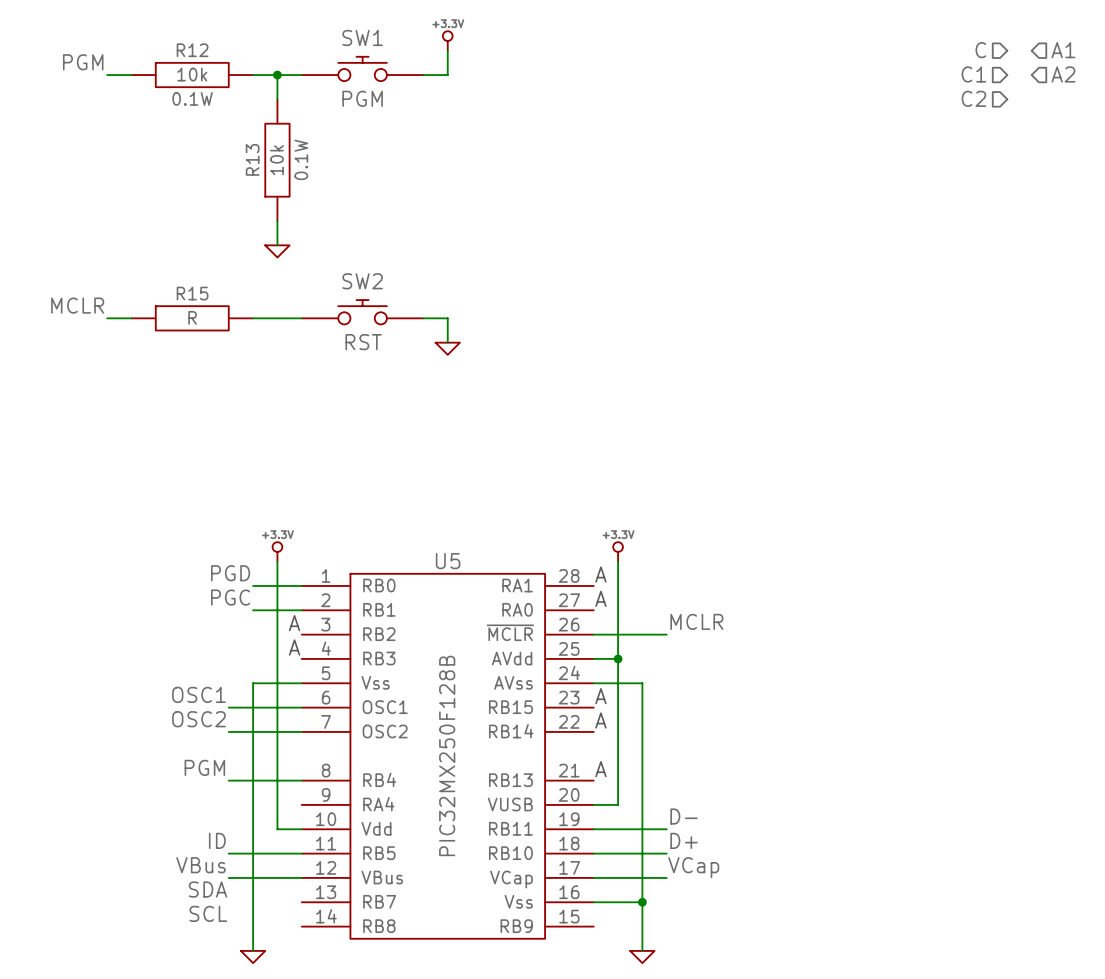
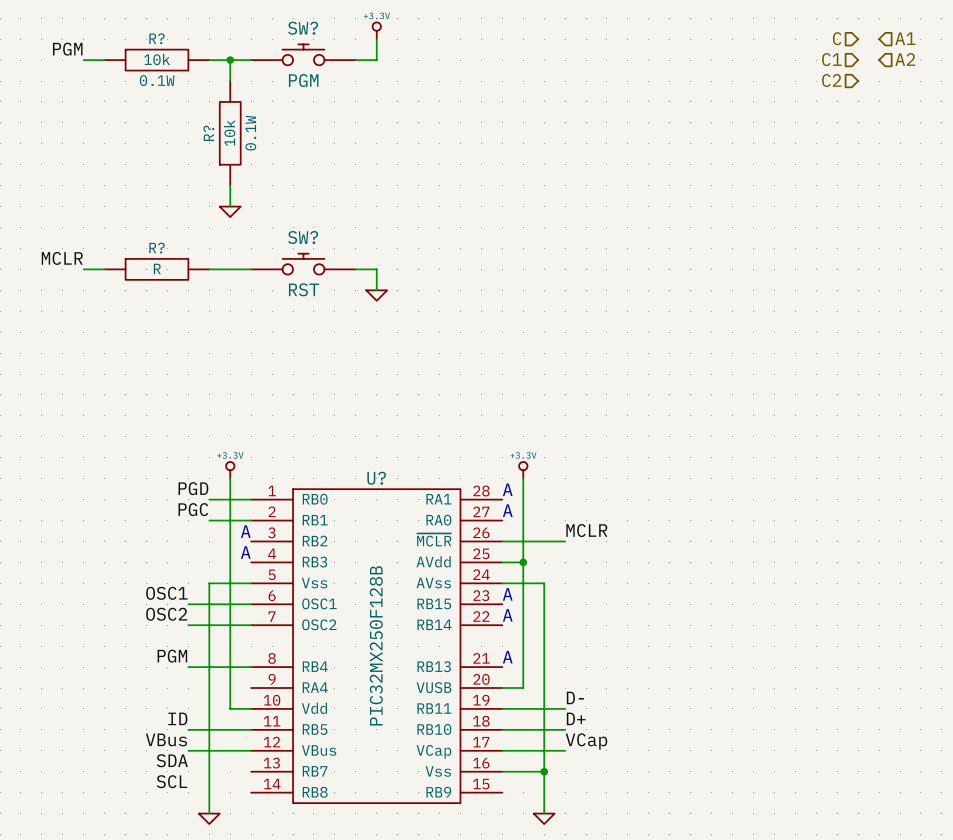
SW1 name: SW1 (362, 37) -> SW? (303, 28)
R12 name: R12 (192, 50) -> R? (156, 38)
R13 name: R13 (252, 159) -> R? (208, 133)
SW2 name: SW2 (362, 281) -> SW? (303, 237)
R15 name: R15 (192, 293) -> R? (156, 248)
U5 name: U5 (448, 561) -> U? (376, 478)

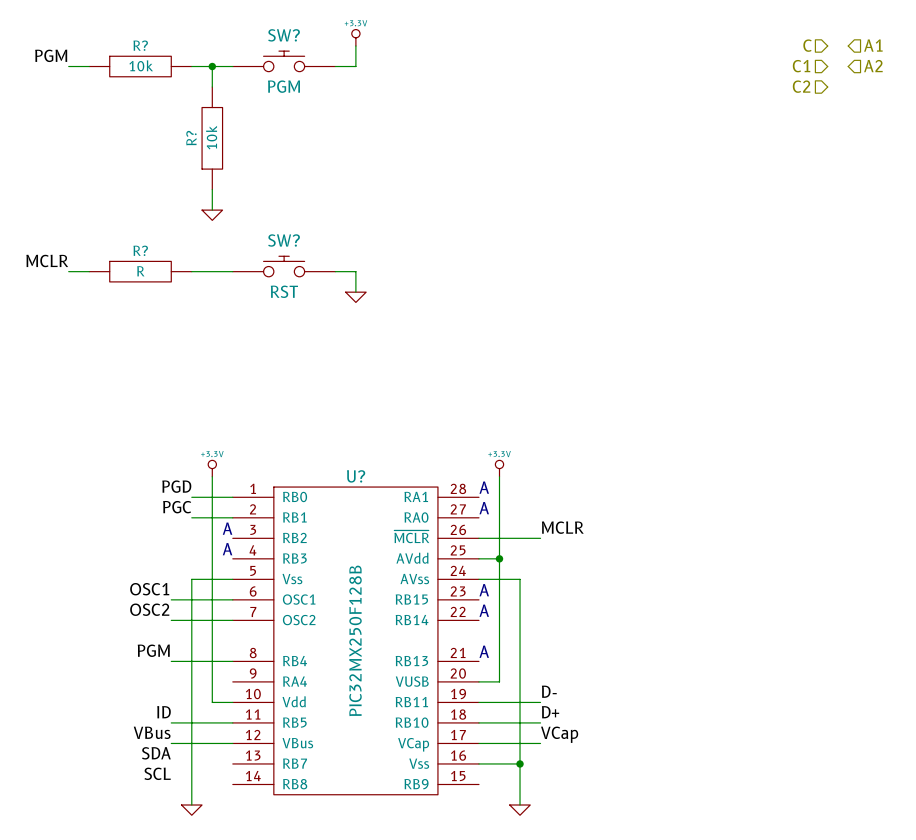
R? text: 0.1W (157, 80) -> none
R? text: 0.1W (250, 133) -> none

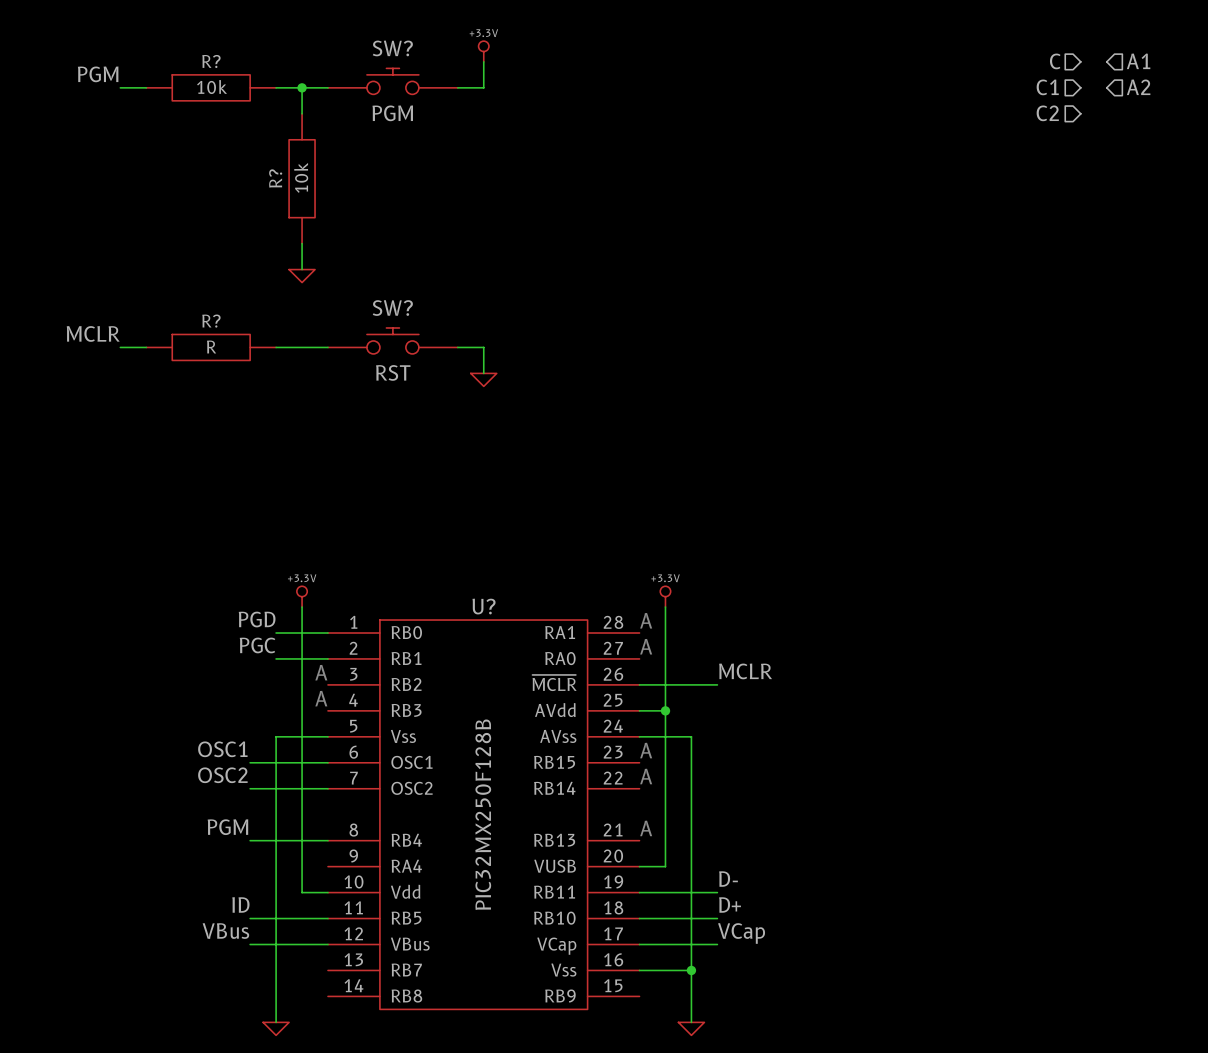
label: SDA (156, 753) -> none
label: SCL (157, 773) -> none

